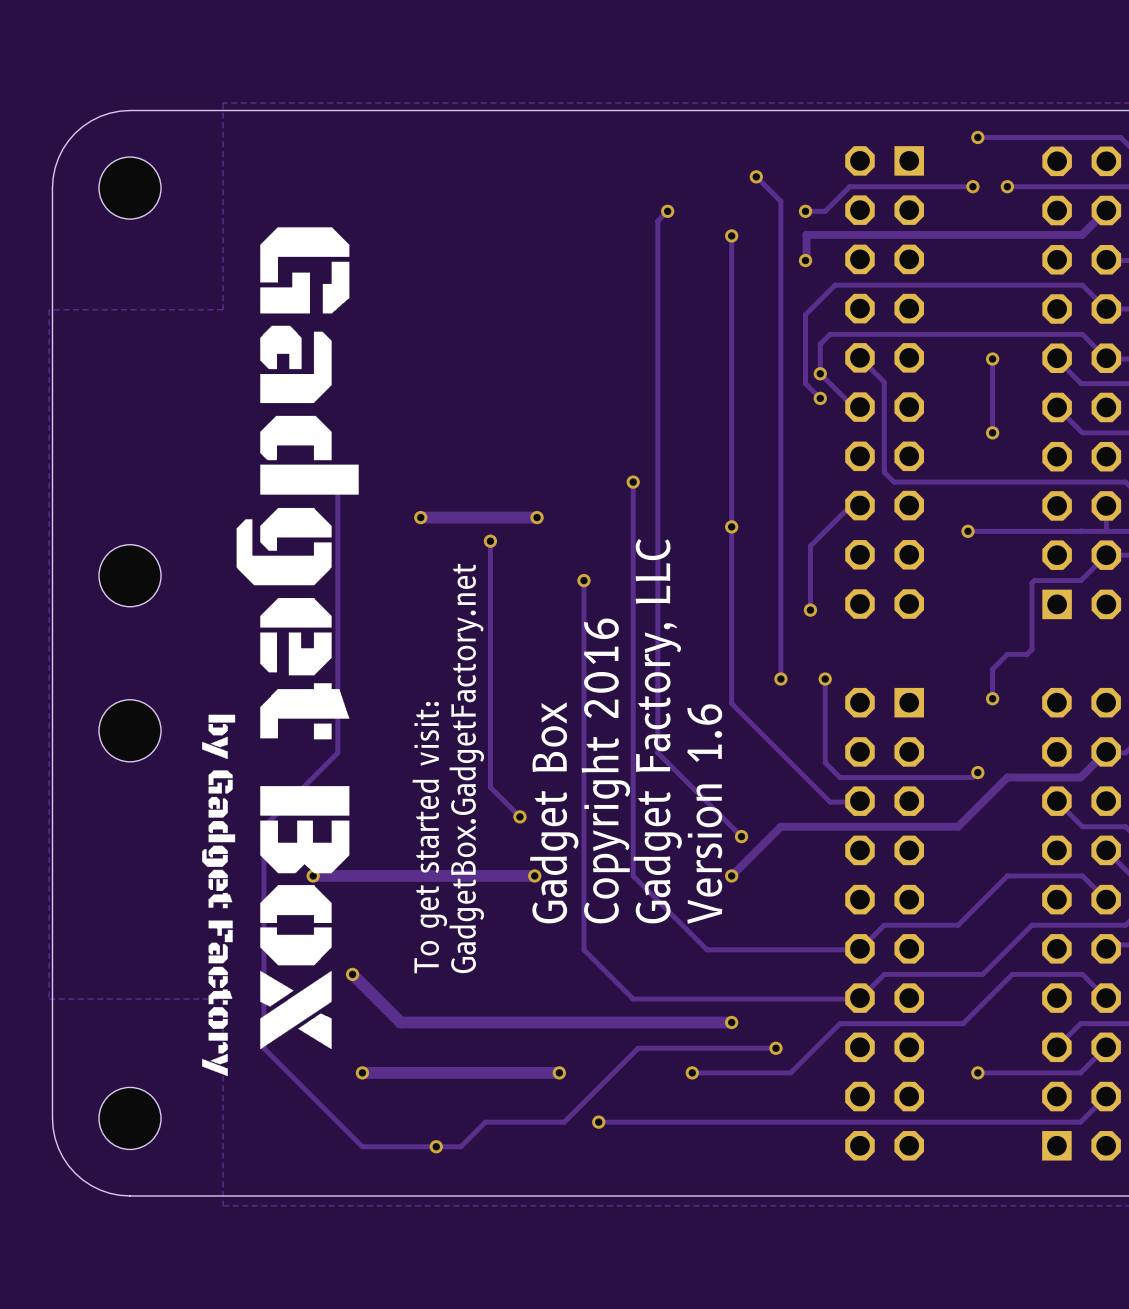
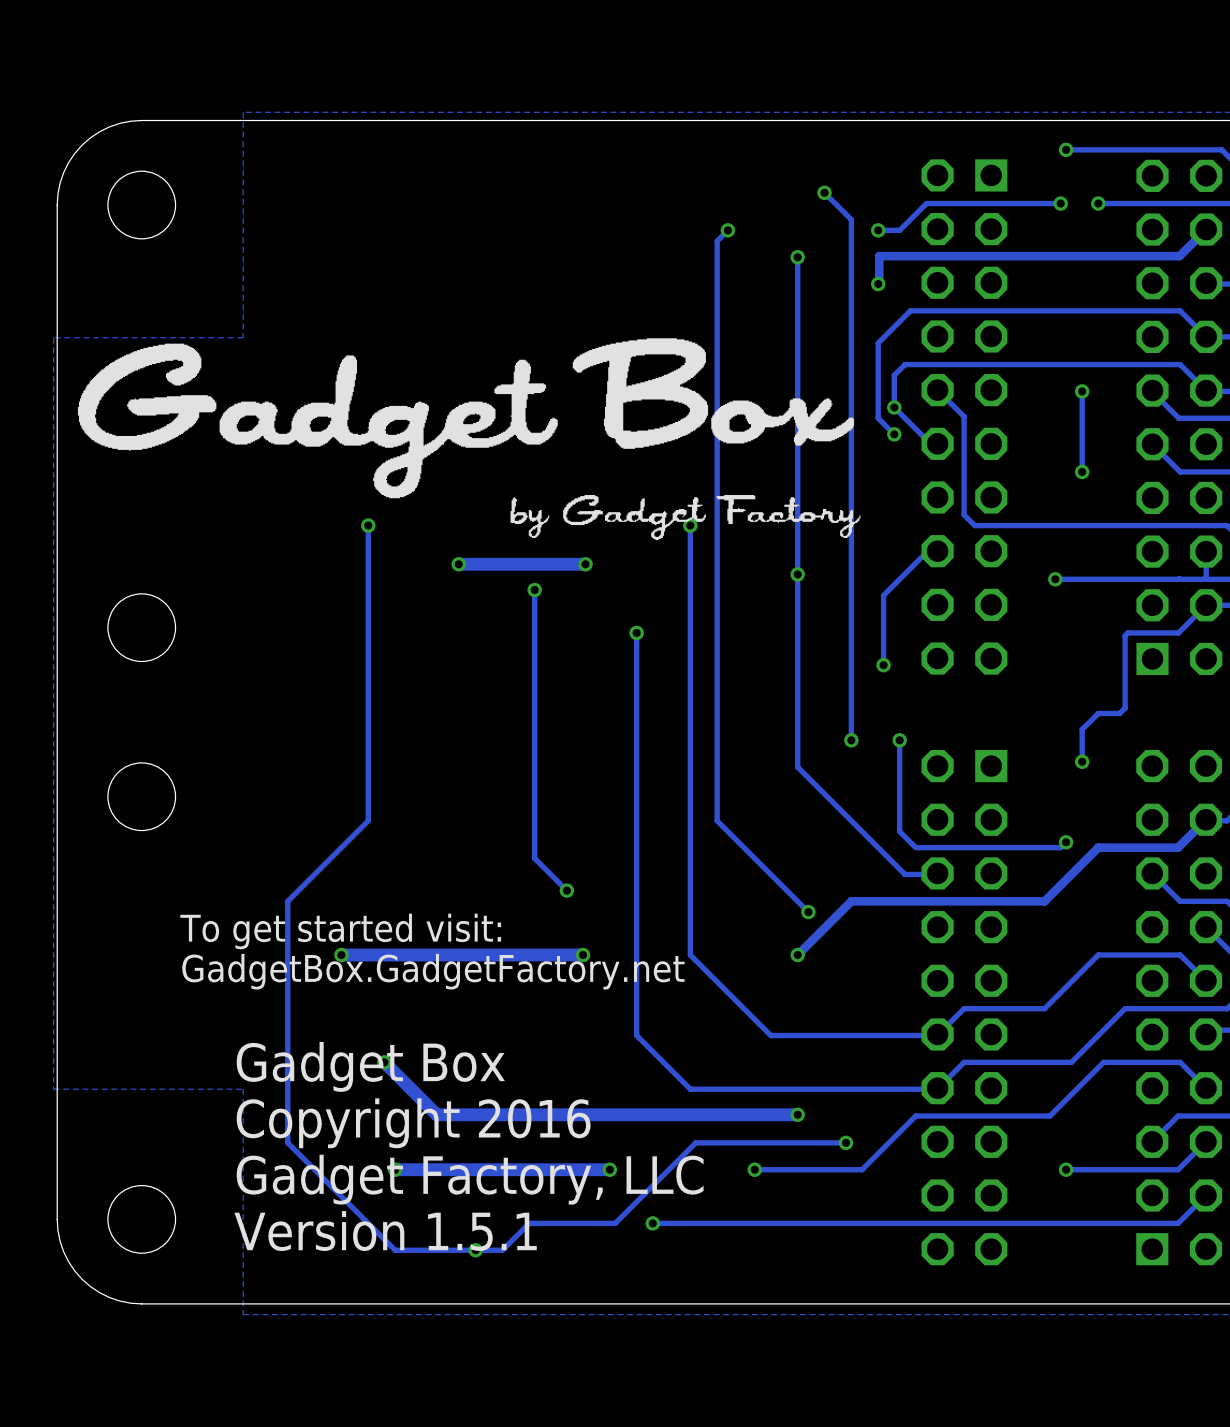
drawing: [202, 227, 359, 1077] -> none
drawing: none -> [77, 338, 861, 541]
text: Gadget Factory, LLC (657, 731) -> none
text rotation: 0° (466, 768) -> 90° clockwise (433, 971)
text rotation: 0° (605, 770) -> 90° clockwise (413, 1123)
text rotation: 0° (554, 812) -> 90° clockwise (370, 1066)
text: Version 1.6 (704, 814) -> none
text rotation: 0° (429, 837) -> 90° clockwise (340, 931)
text: none -> Gadget Factory, LLC (470, 1179)
text: none -> Version 1.5.1 (385, 1231)

